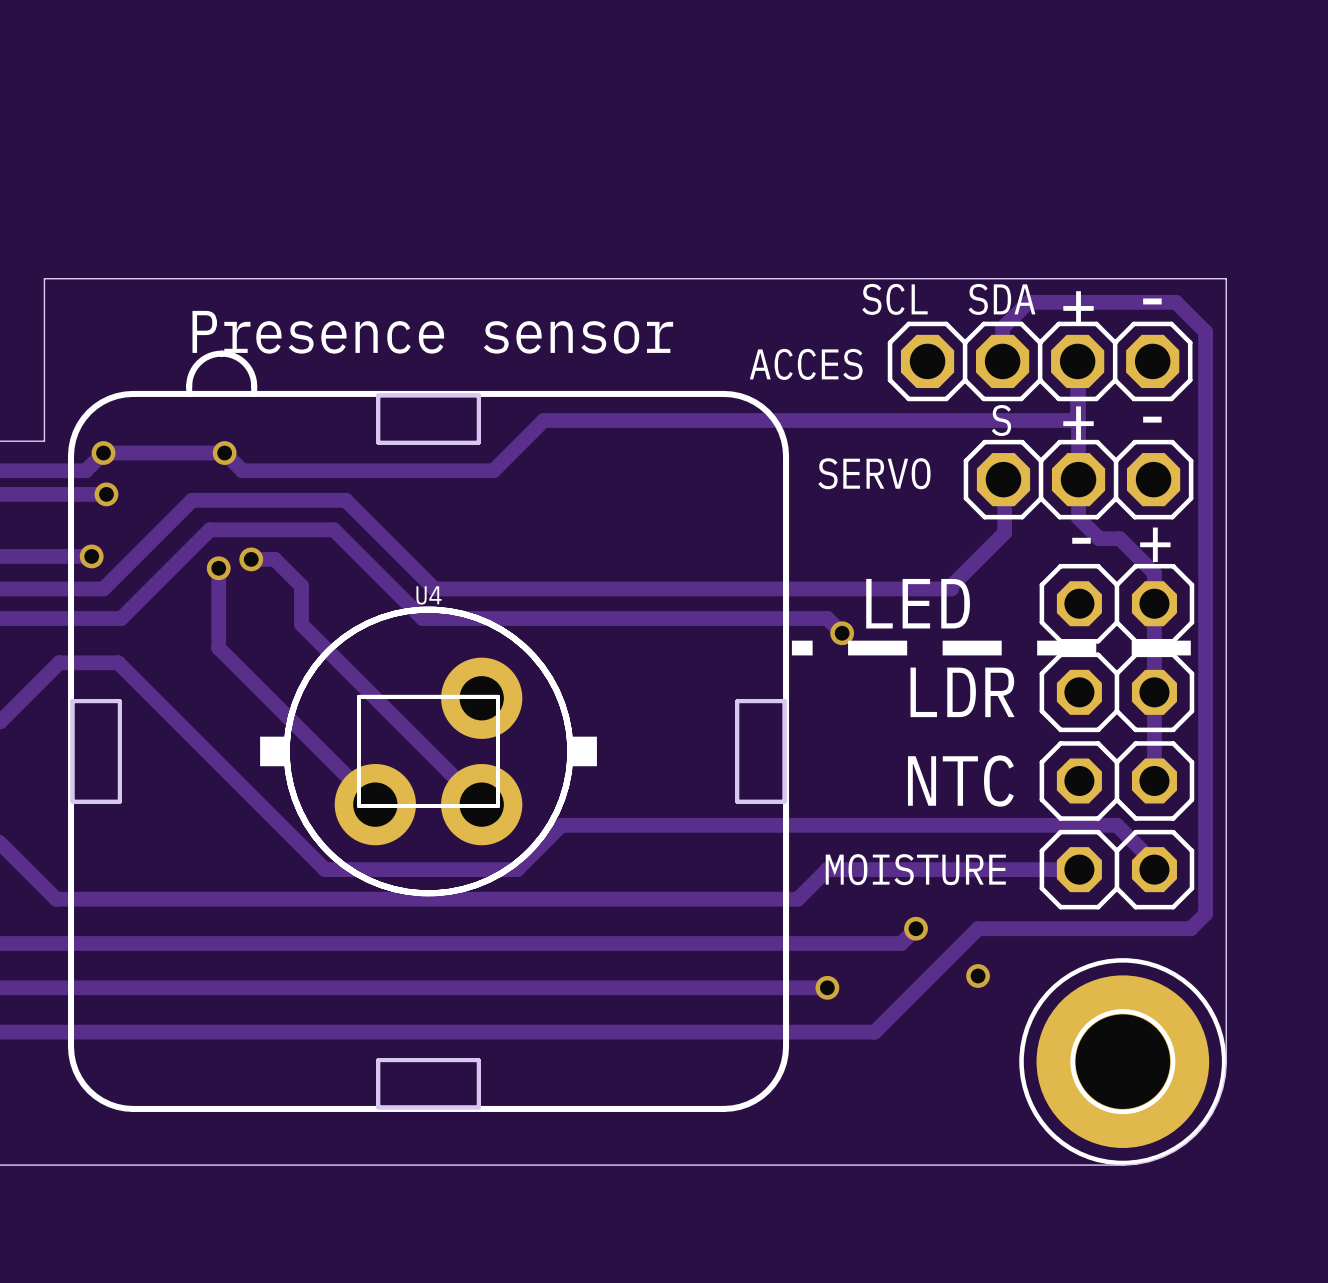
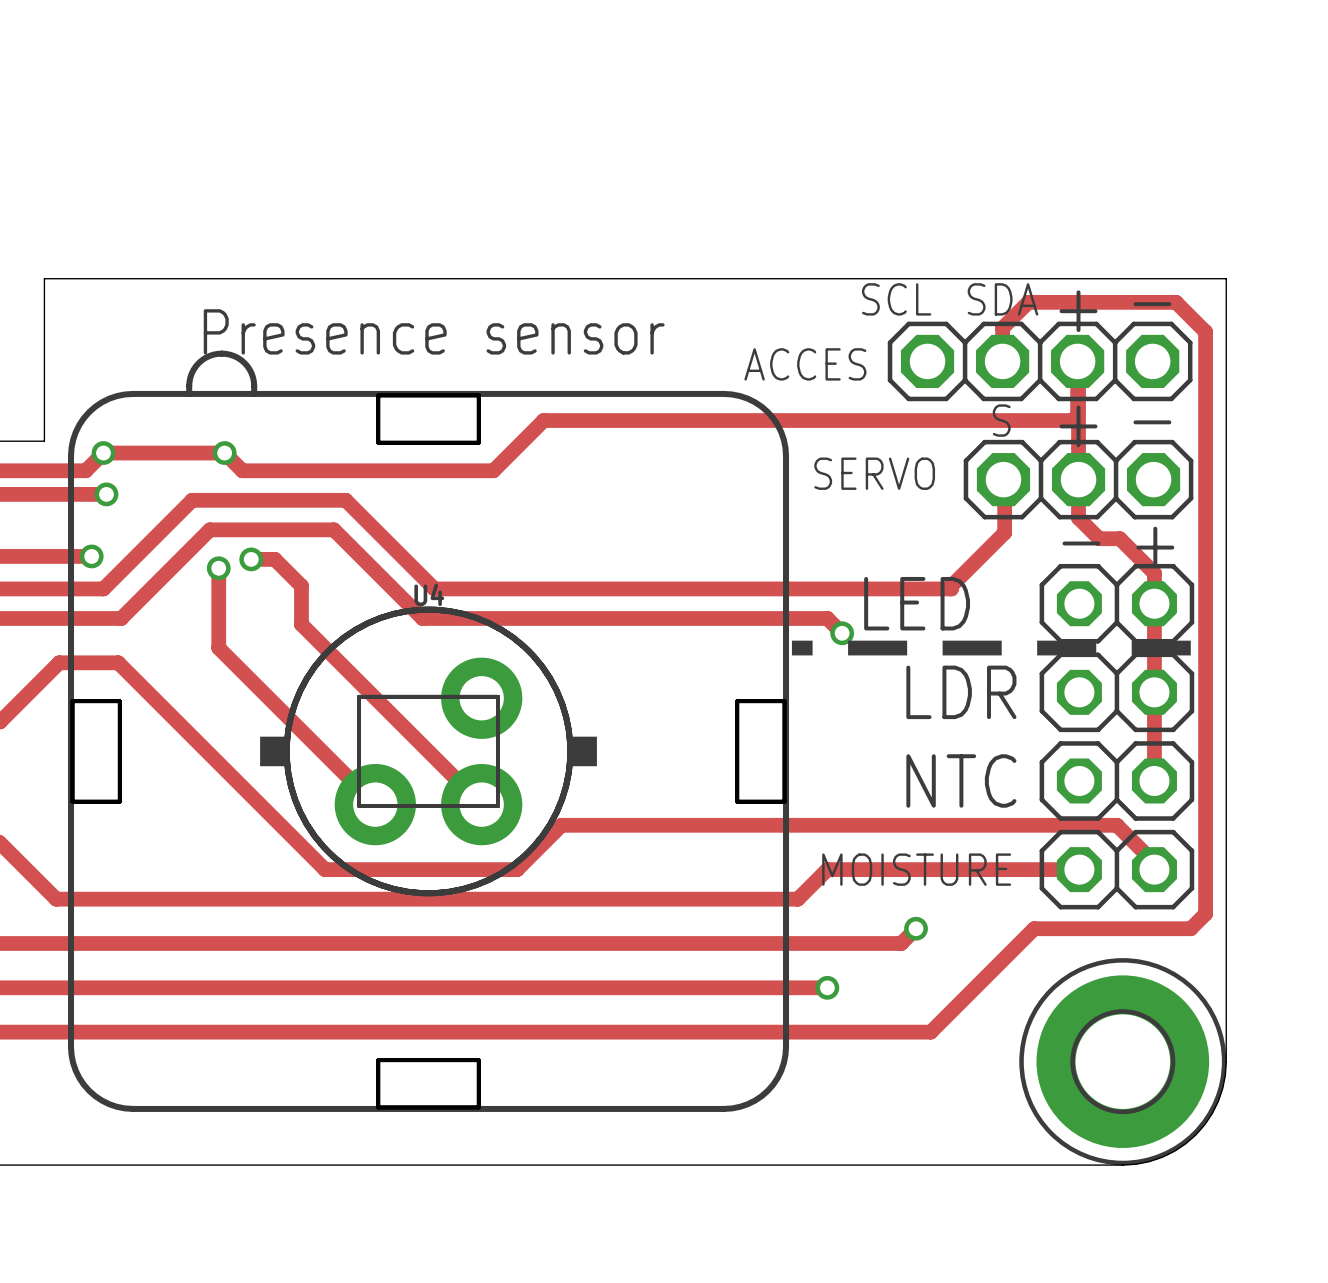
track: (1034, 928) (978, 928) (874, 1032) -> (1034, 928) (930, 1032) (874, 1032)
via: (978, 976) -> none

